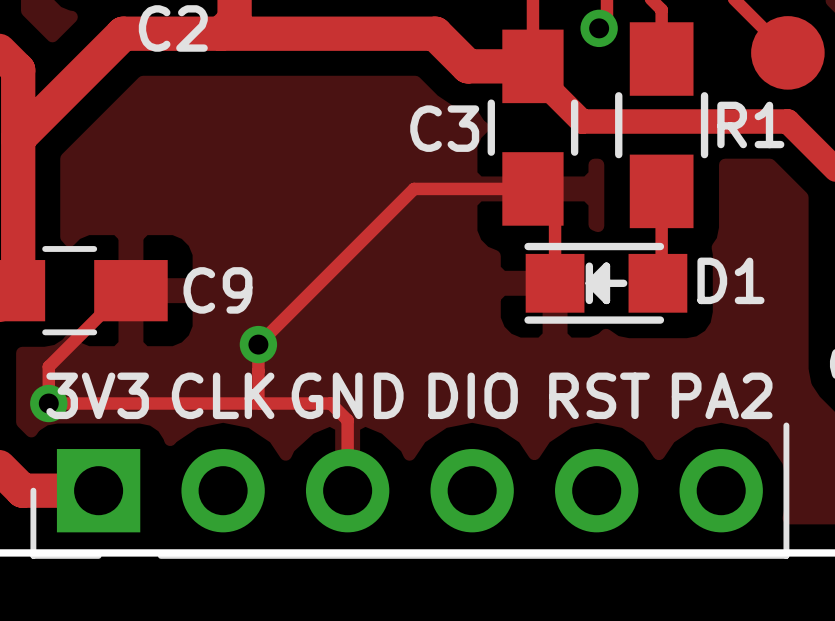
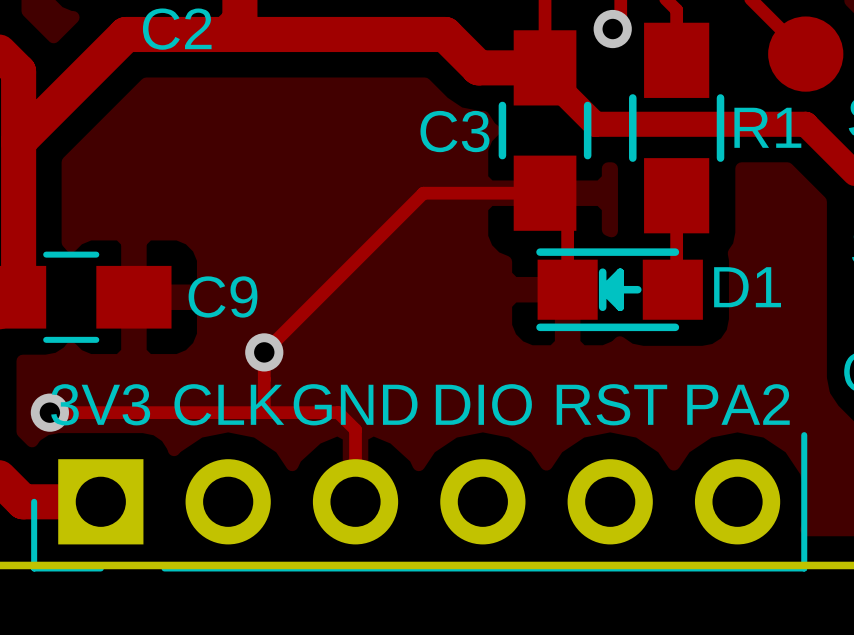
track: (130, 290) (124, 290) (48, 366) (48, 403) -> none

